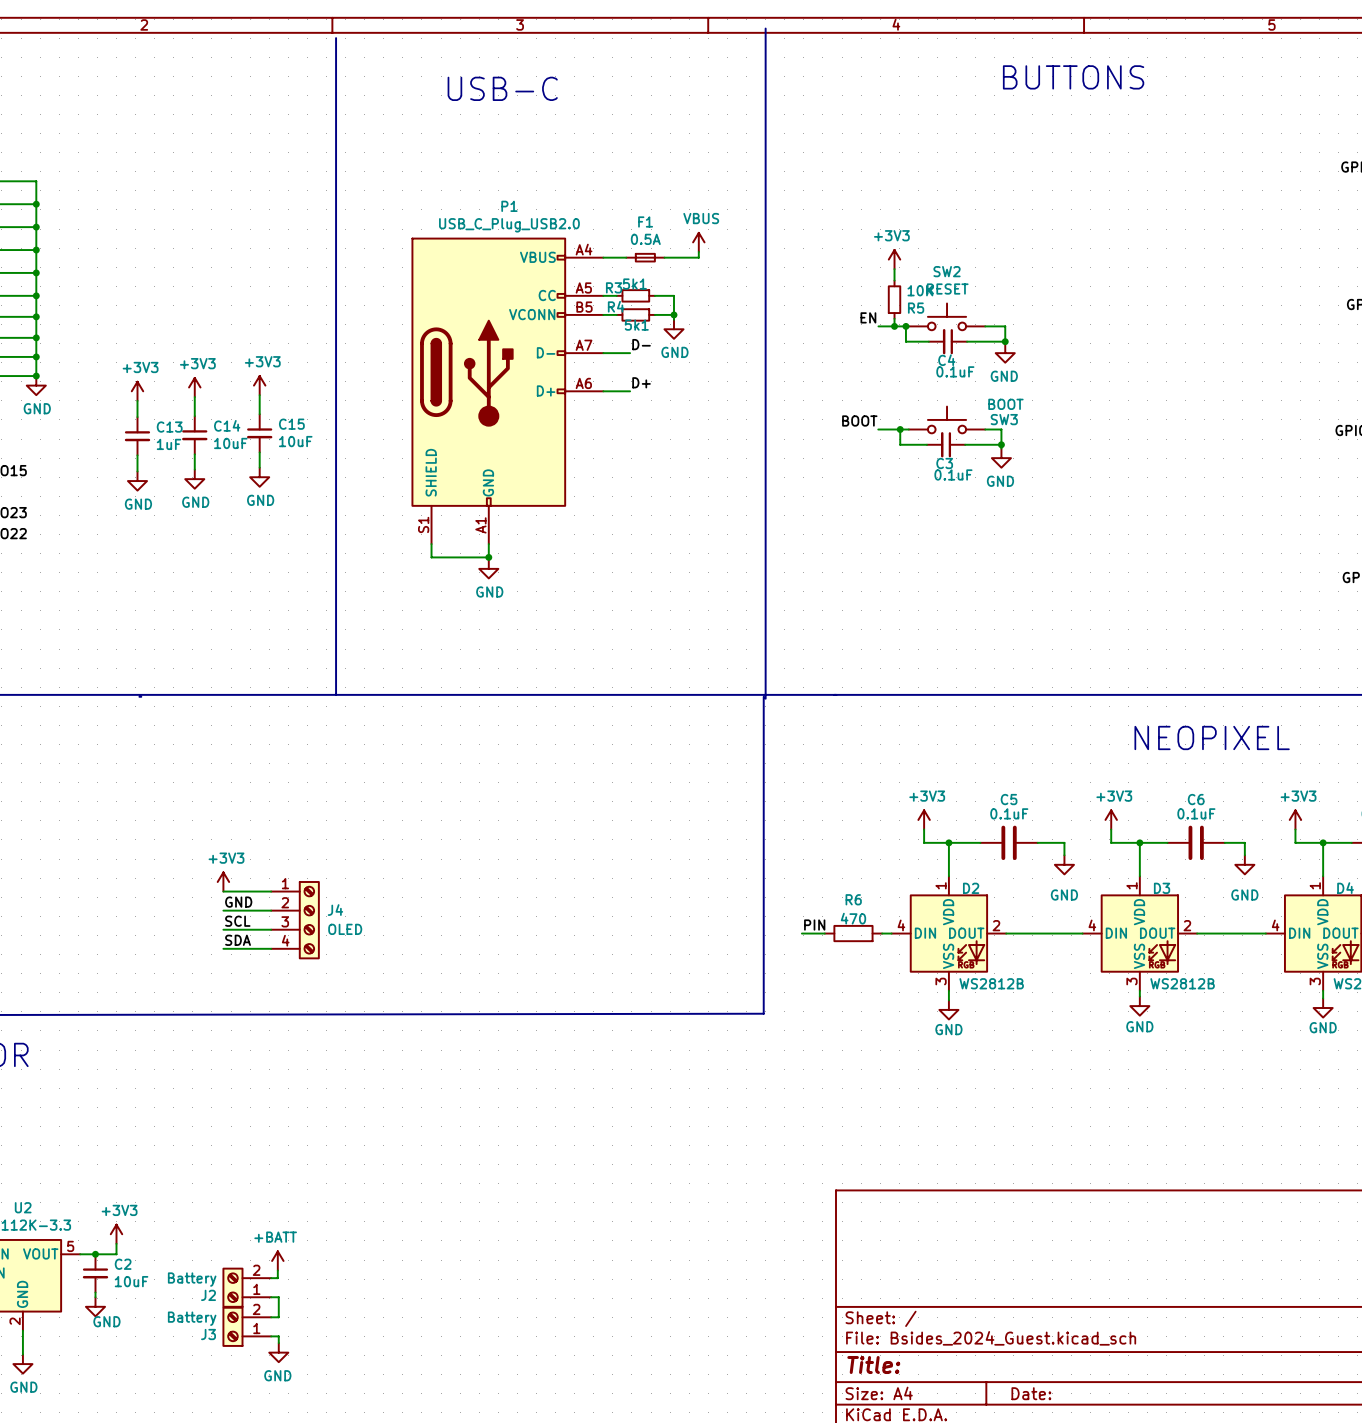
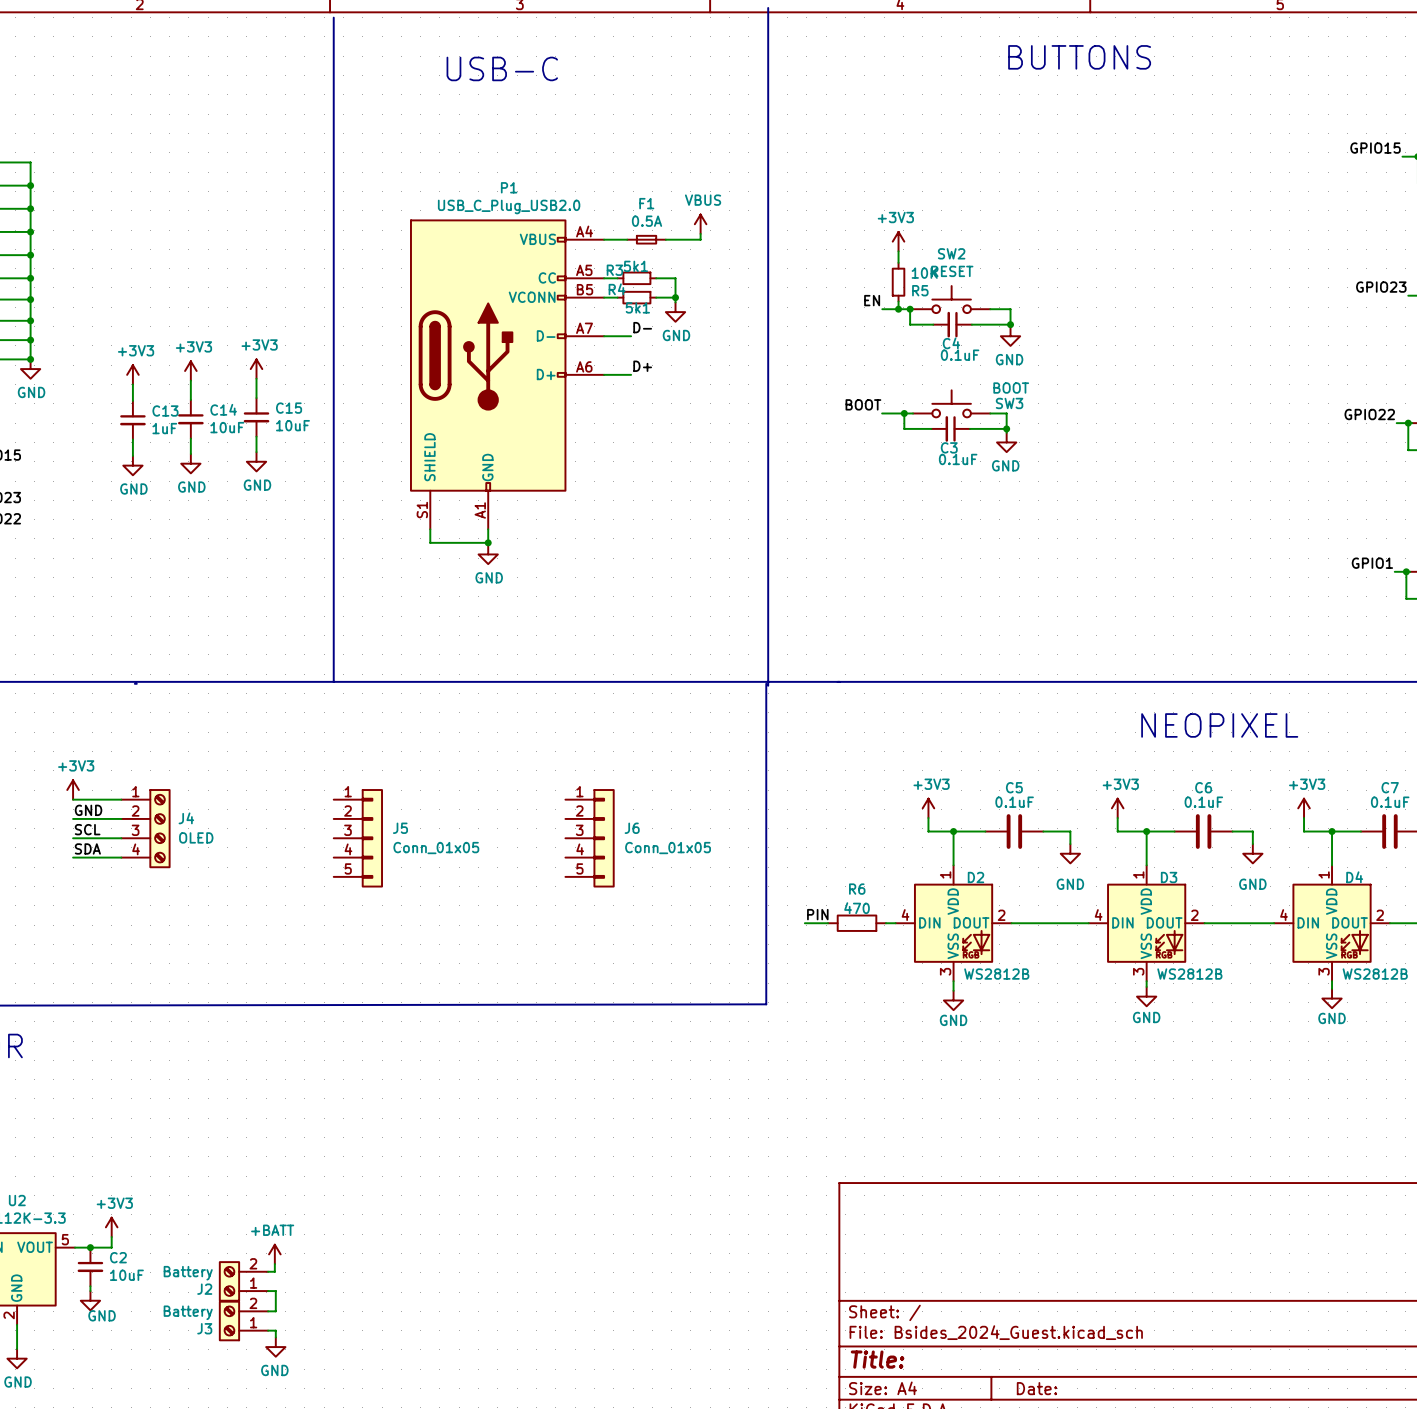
wire: none -> (73, 799) (121, 799)
J5: none -> Conn_01x05 (358, 838)
J6: none -> Conn_01x05 (590, 838)
power symbol position: +3V3 (223, 881) -> +3V3 (73, 790)
wire: (223, 891) (271, 891) -> (73, 857) (121, 857)
label position: GND (238, 902) -> GND (88, 810)
wire: (223, 910) (271, 910) -> (73, 838) (121, 838)
J4 position: (295, 920) -> (145, 828)
label position: SCL (237, 921) -> SCL (87, 829)
wire: (223, 929) (271, 929) -> (73, 818) (121, 818)
label position: SDA (238, 940) -> SDA (87, 848)
wire: (223, 948) (271, 948) -> none

